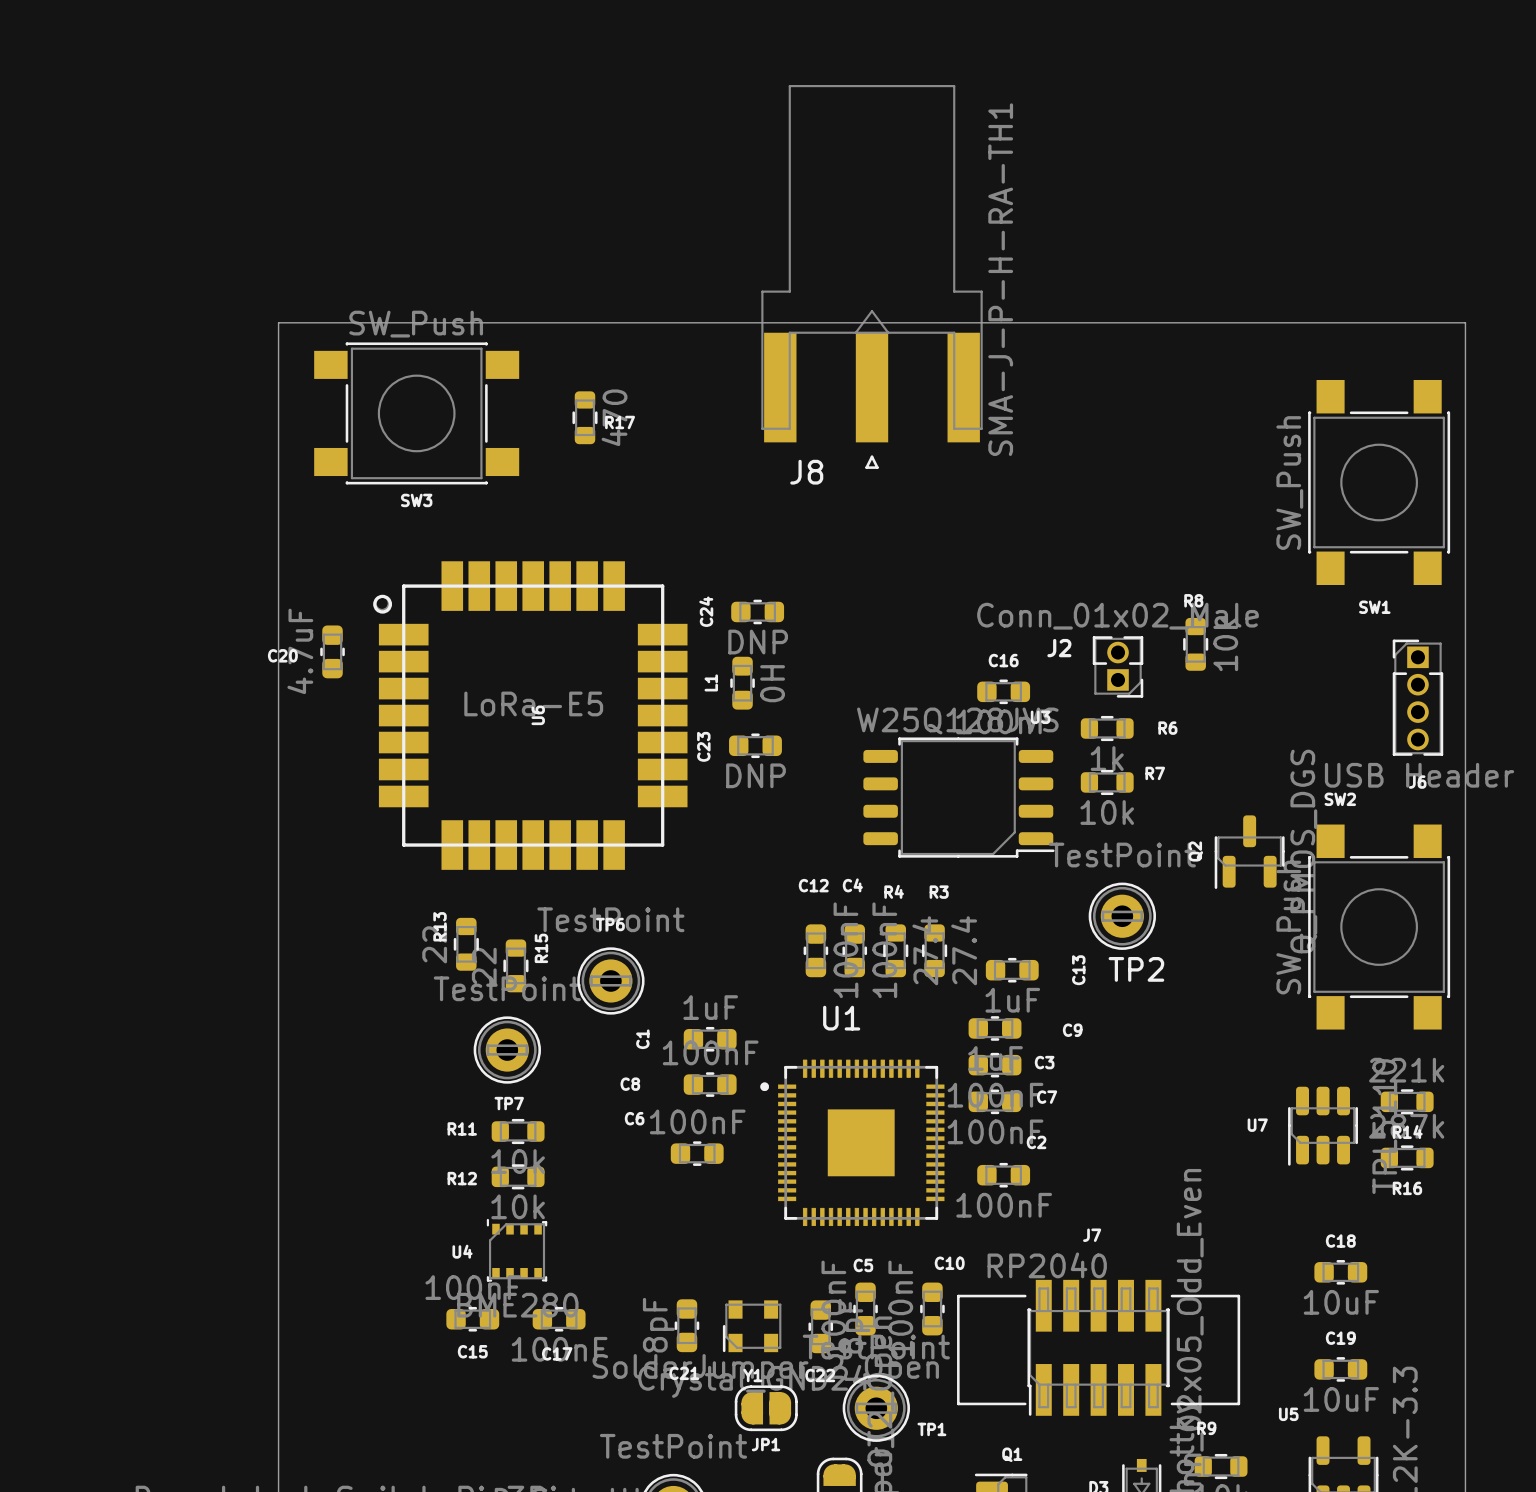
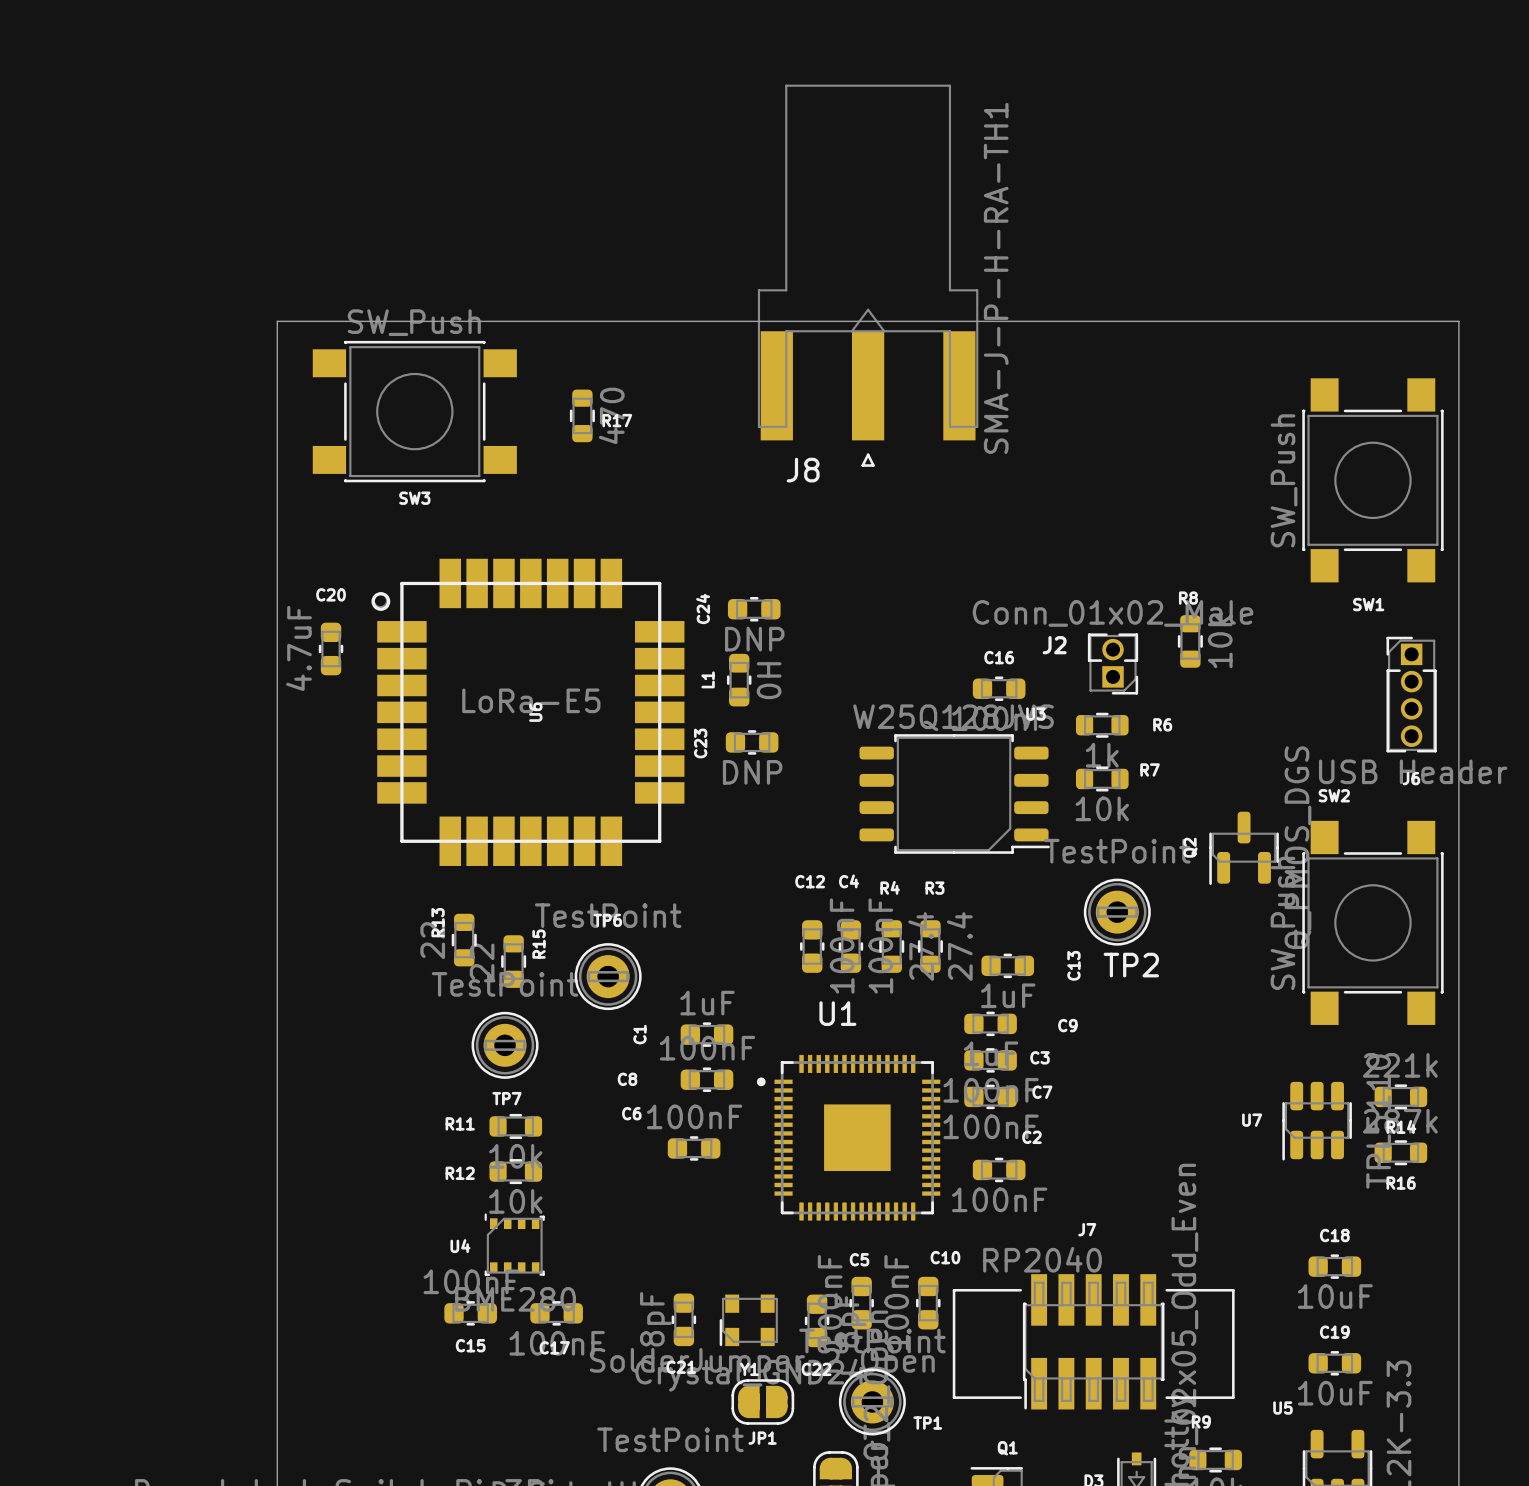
C20 name position: C20 (282, 655) -> C20 (331, 594)

